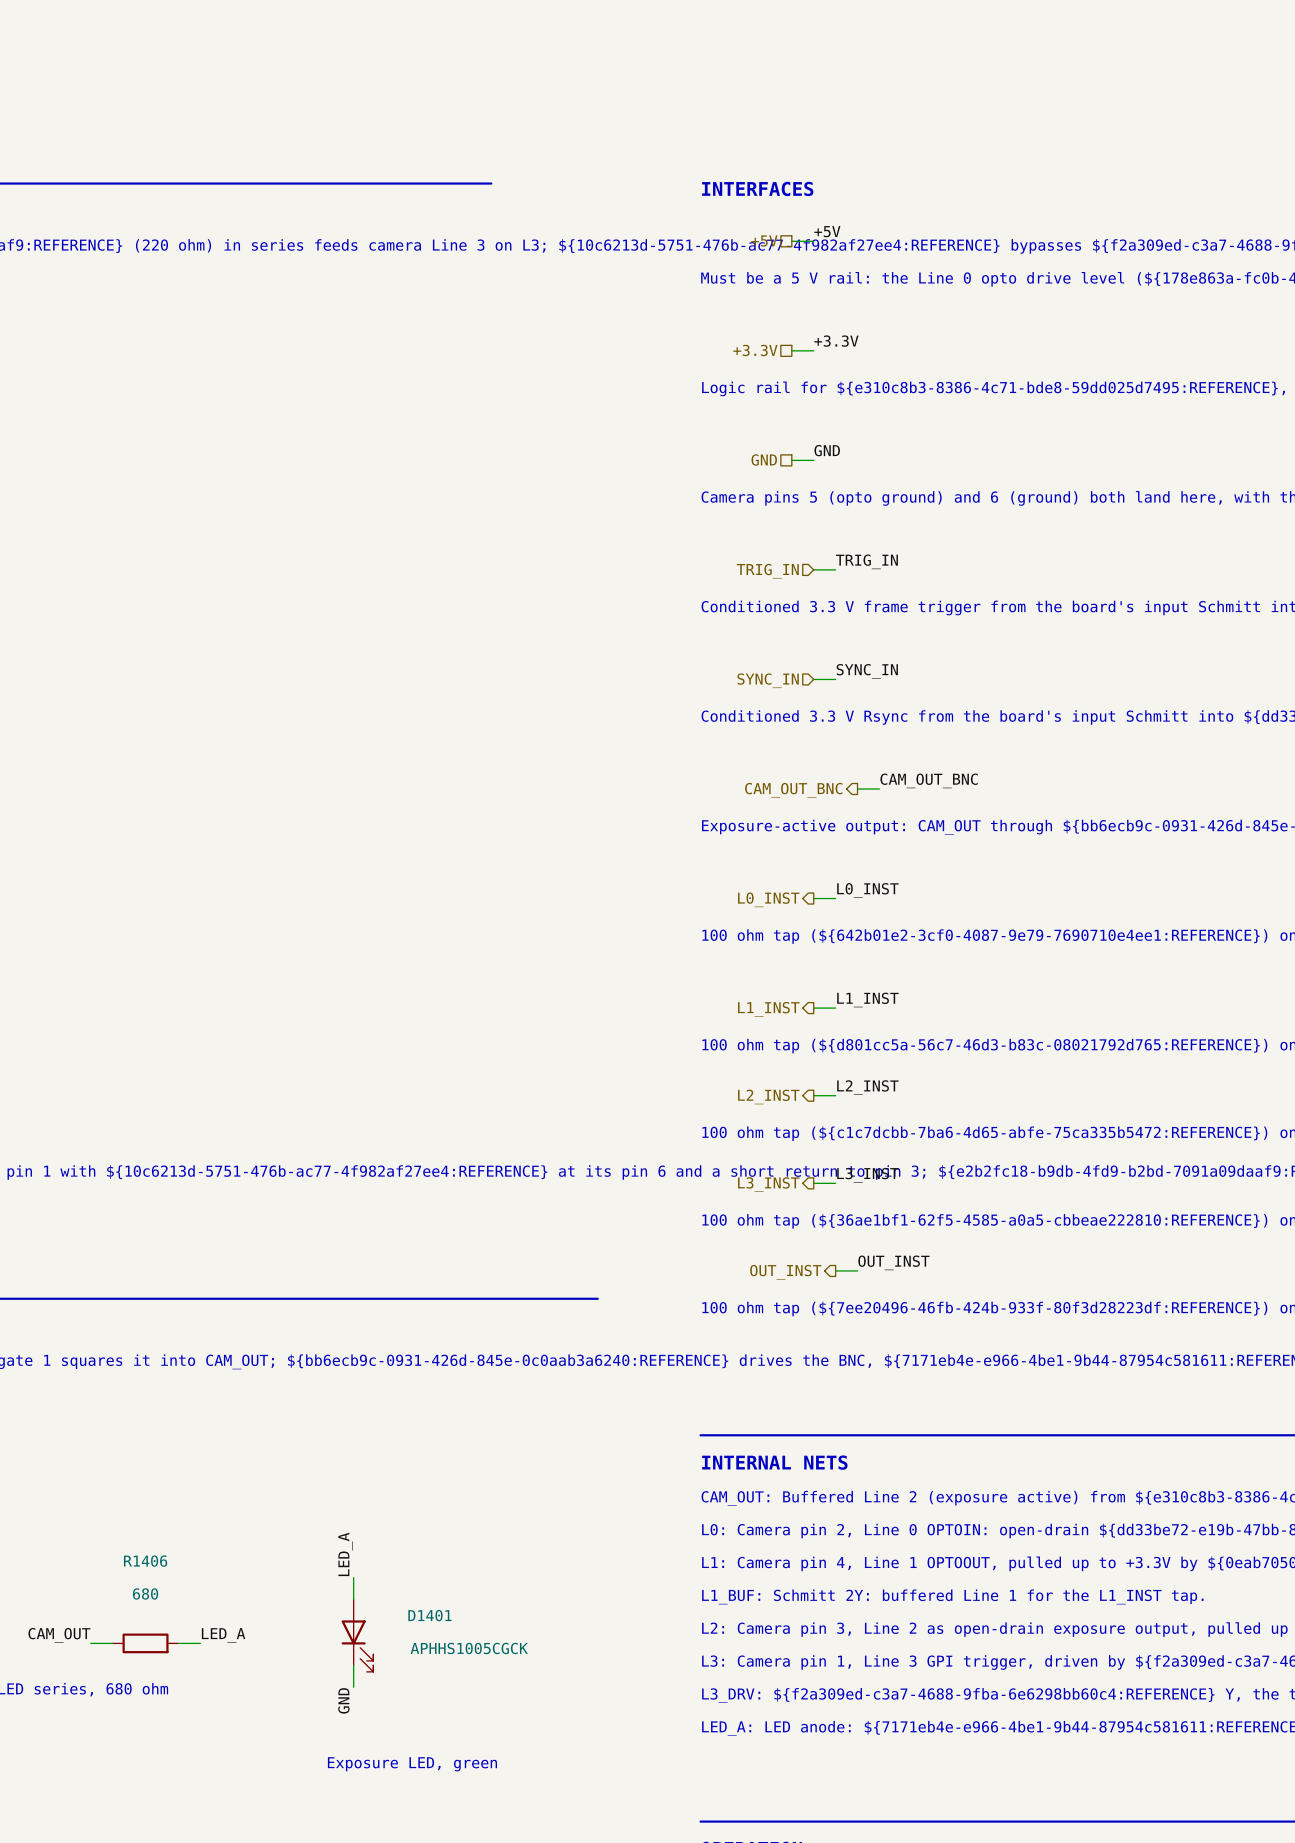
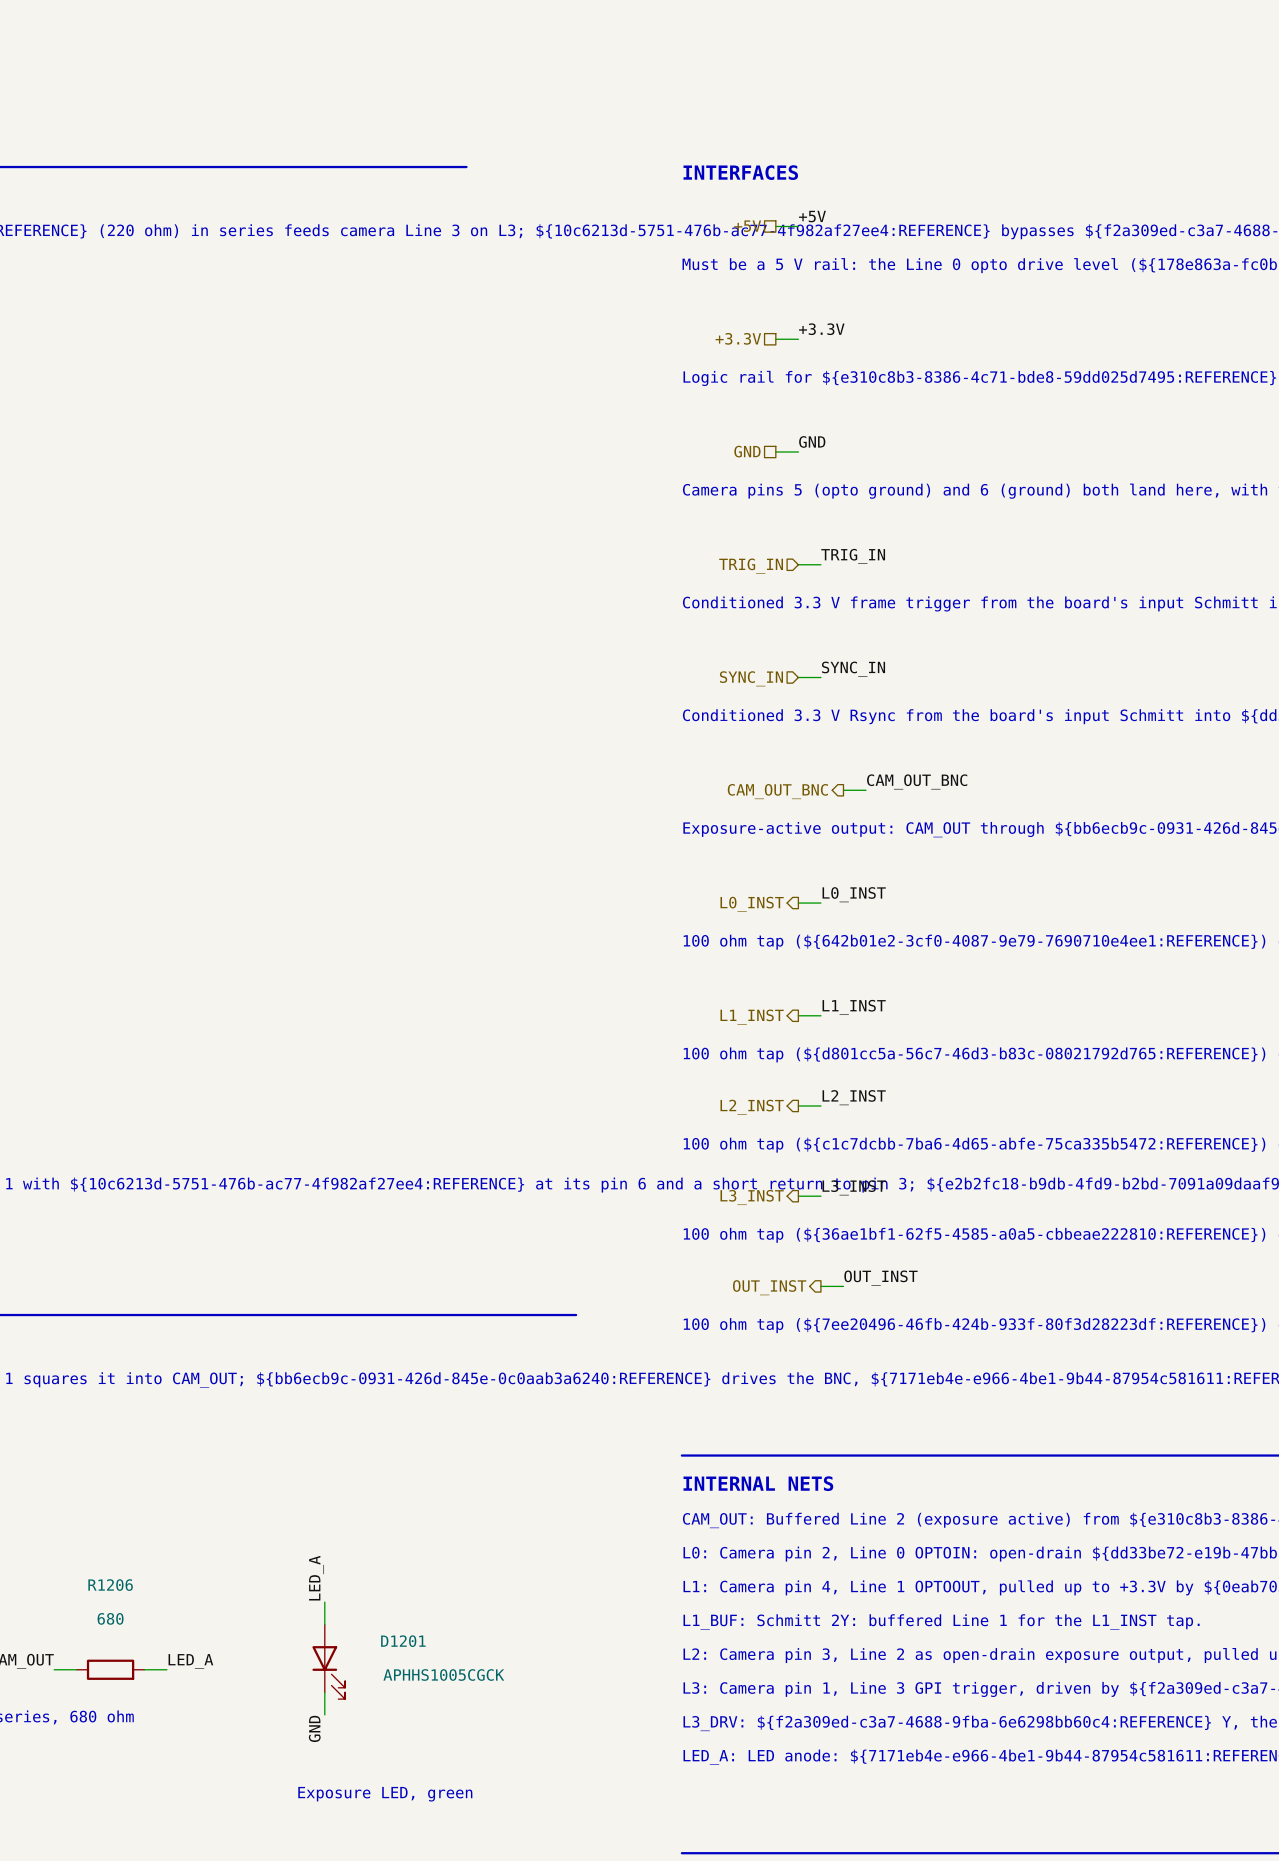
R1406 name: R1406 (145, 1561) -> R1206 (110, 1585)
D1401 name: D1401 (429, 1615) -> D1201 (403, 1641)

